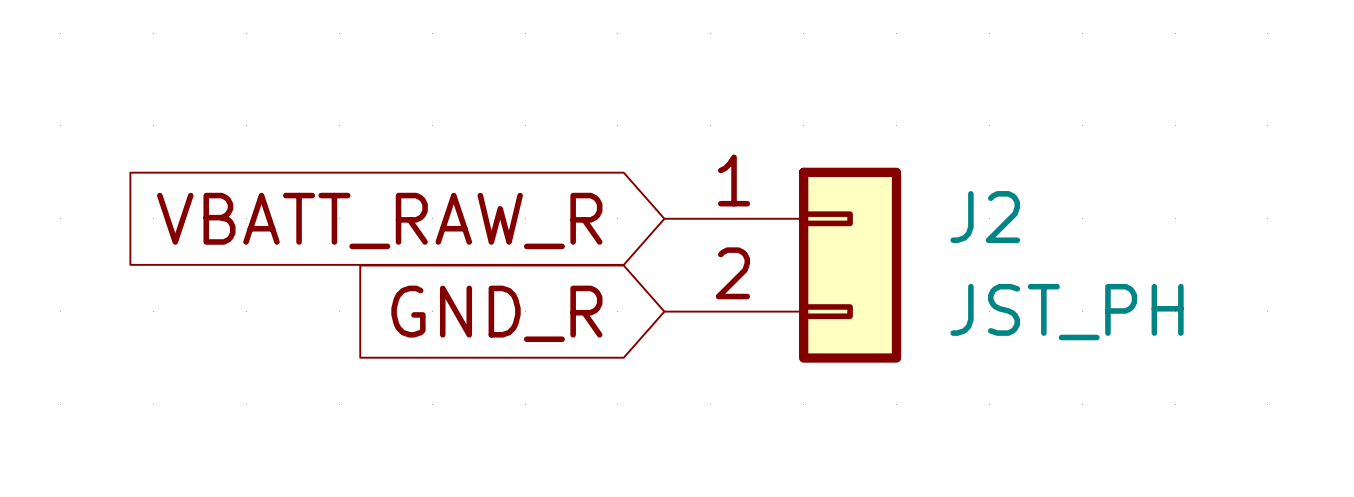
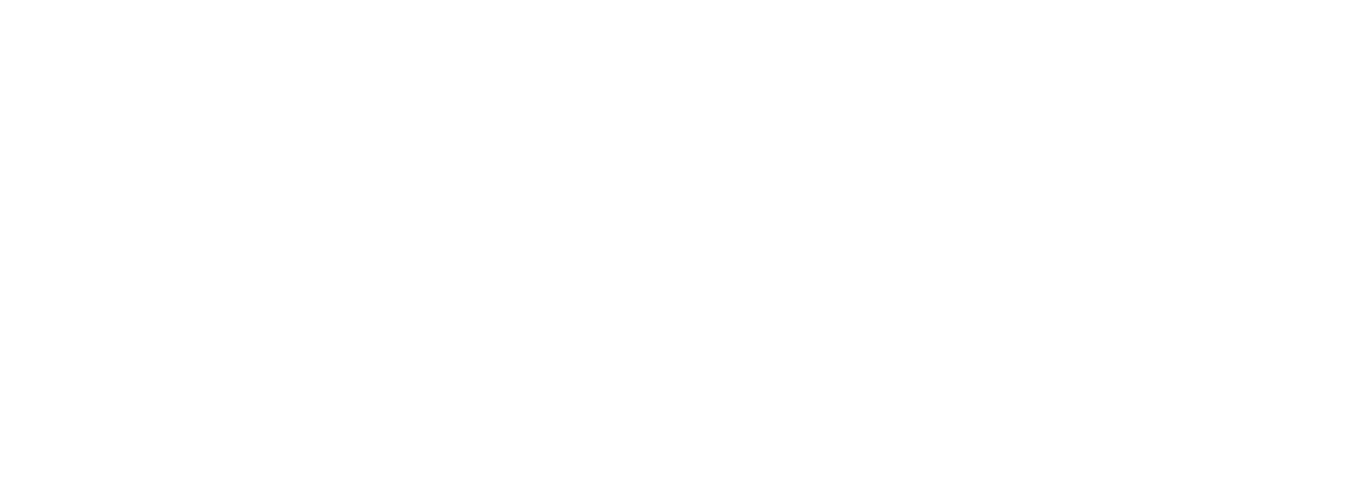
global label: VBATT_RAW_R (379, 220) -> none
J2: JST_PH (782, 265) -> none
global label: GND_R (496, 313) -> none

